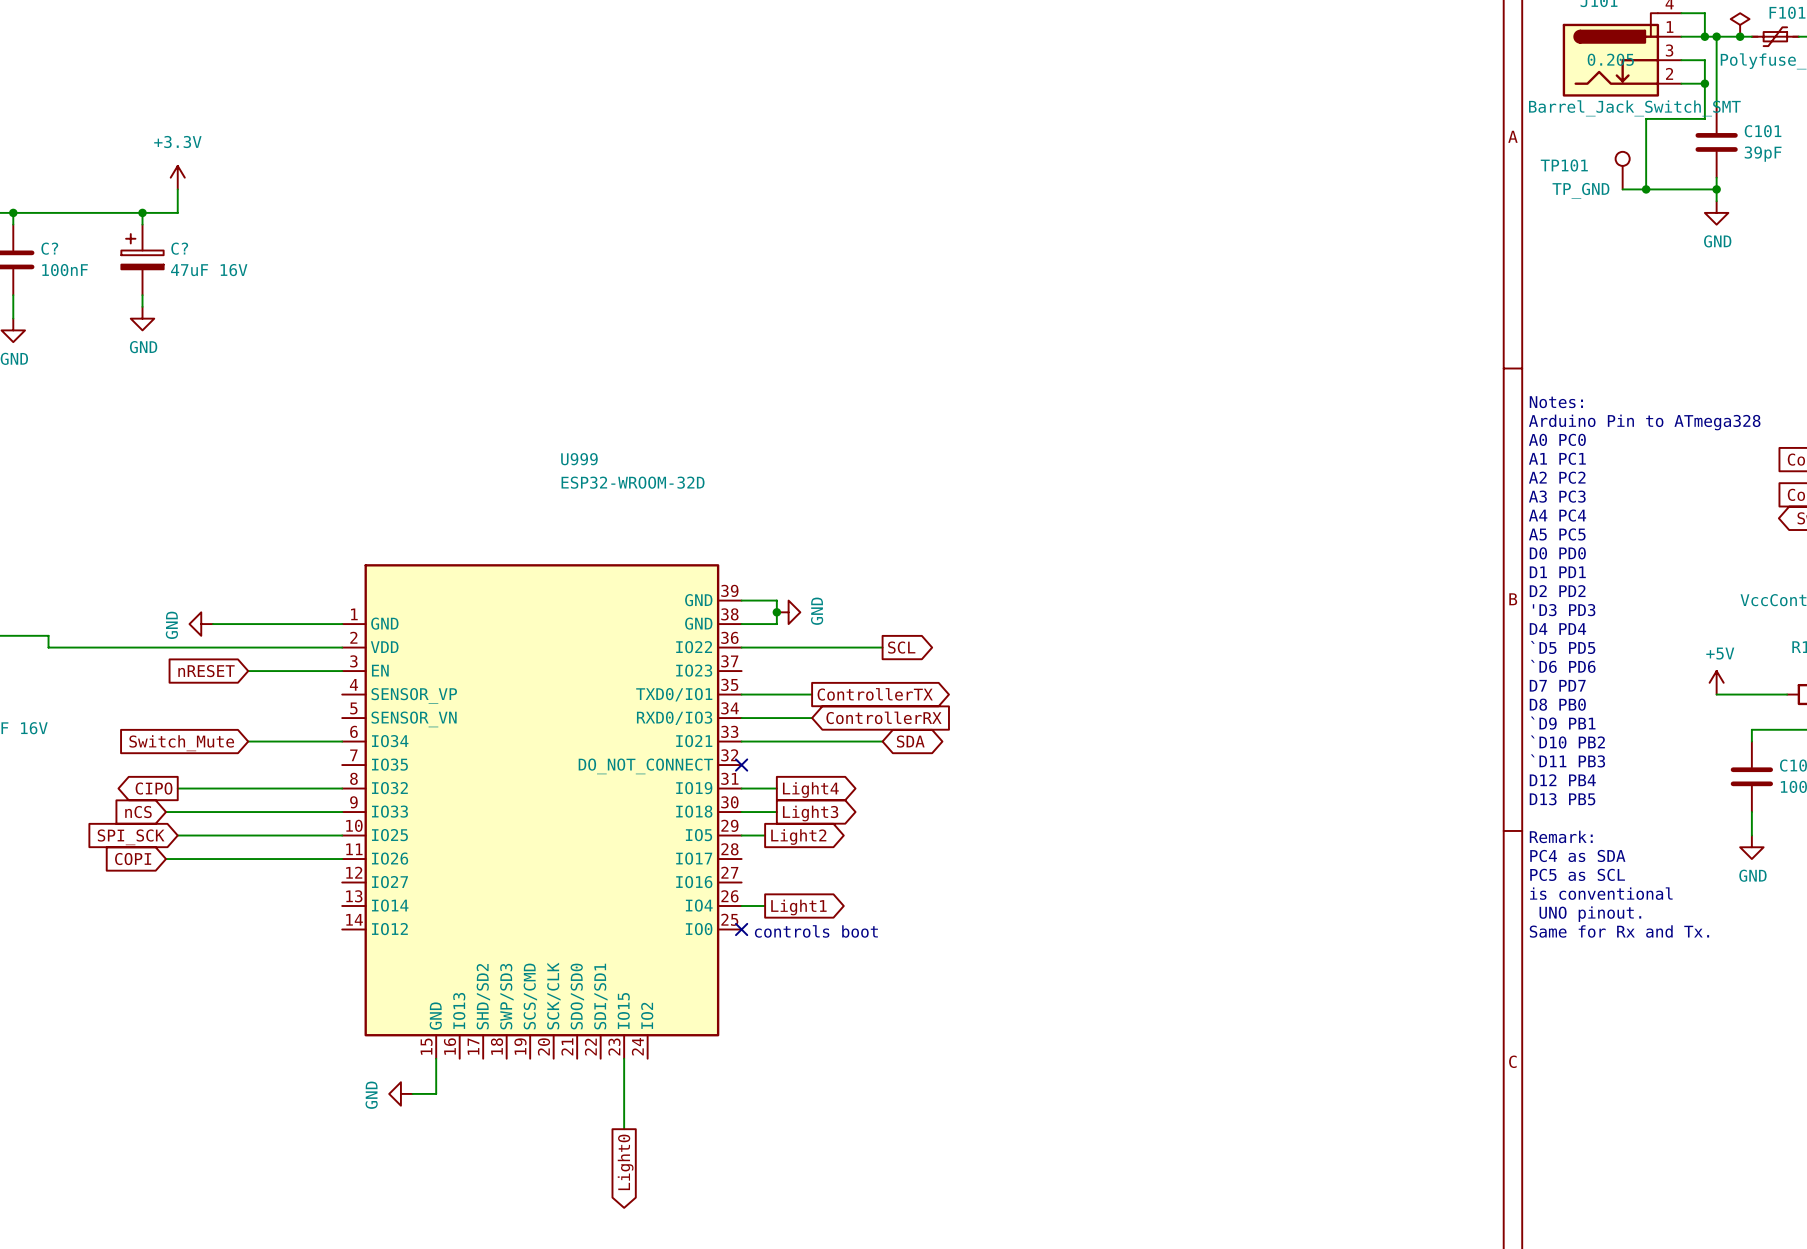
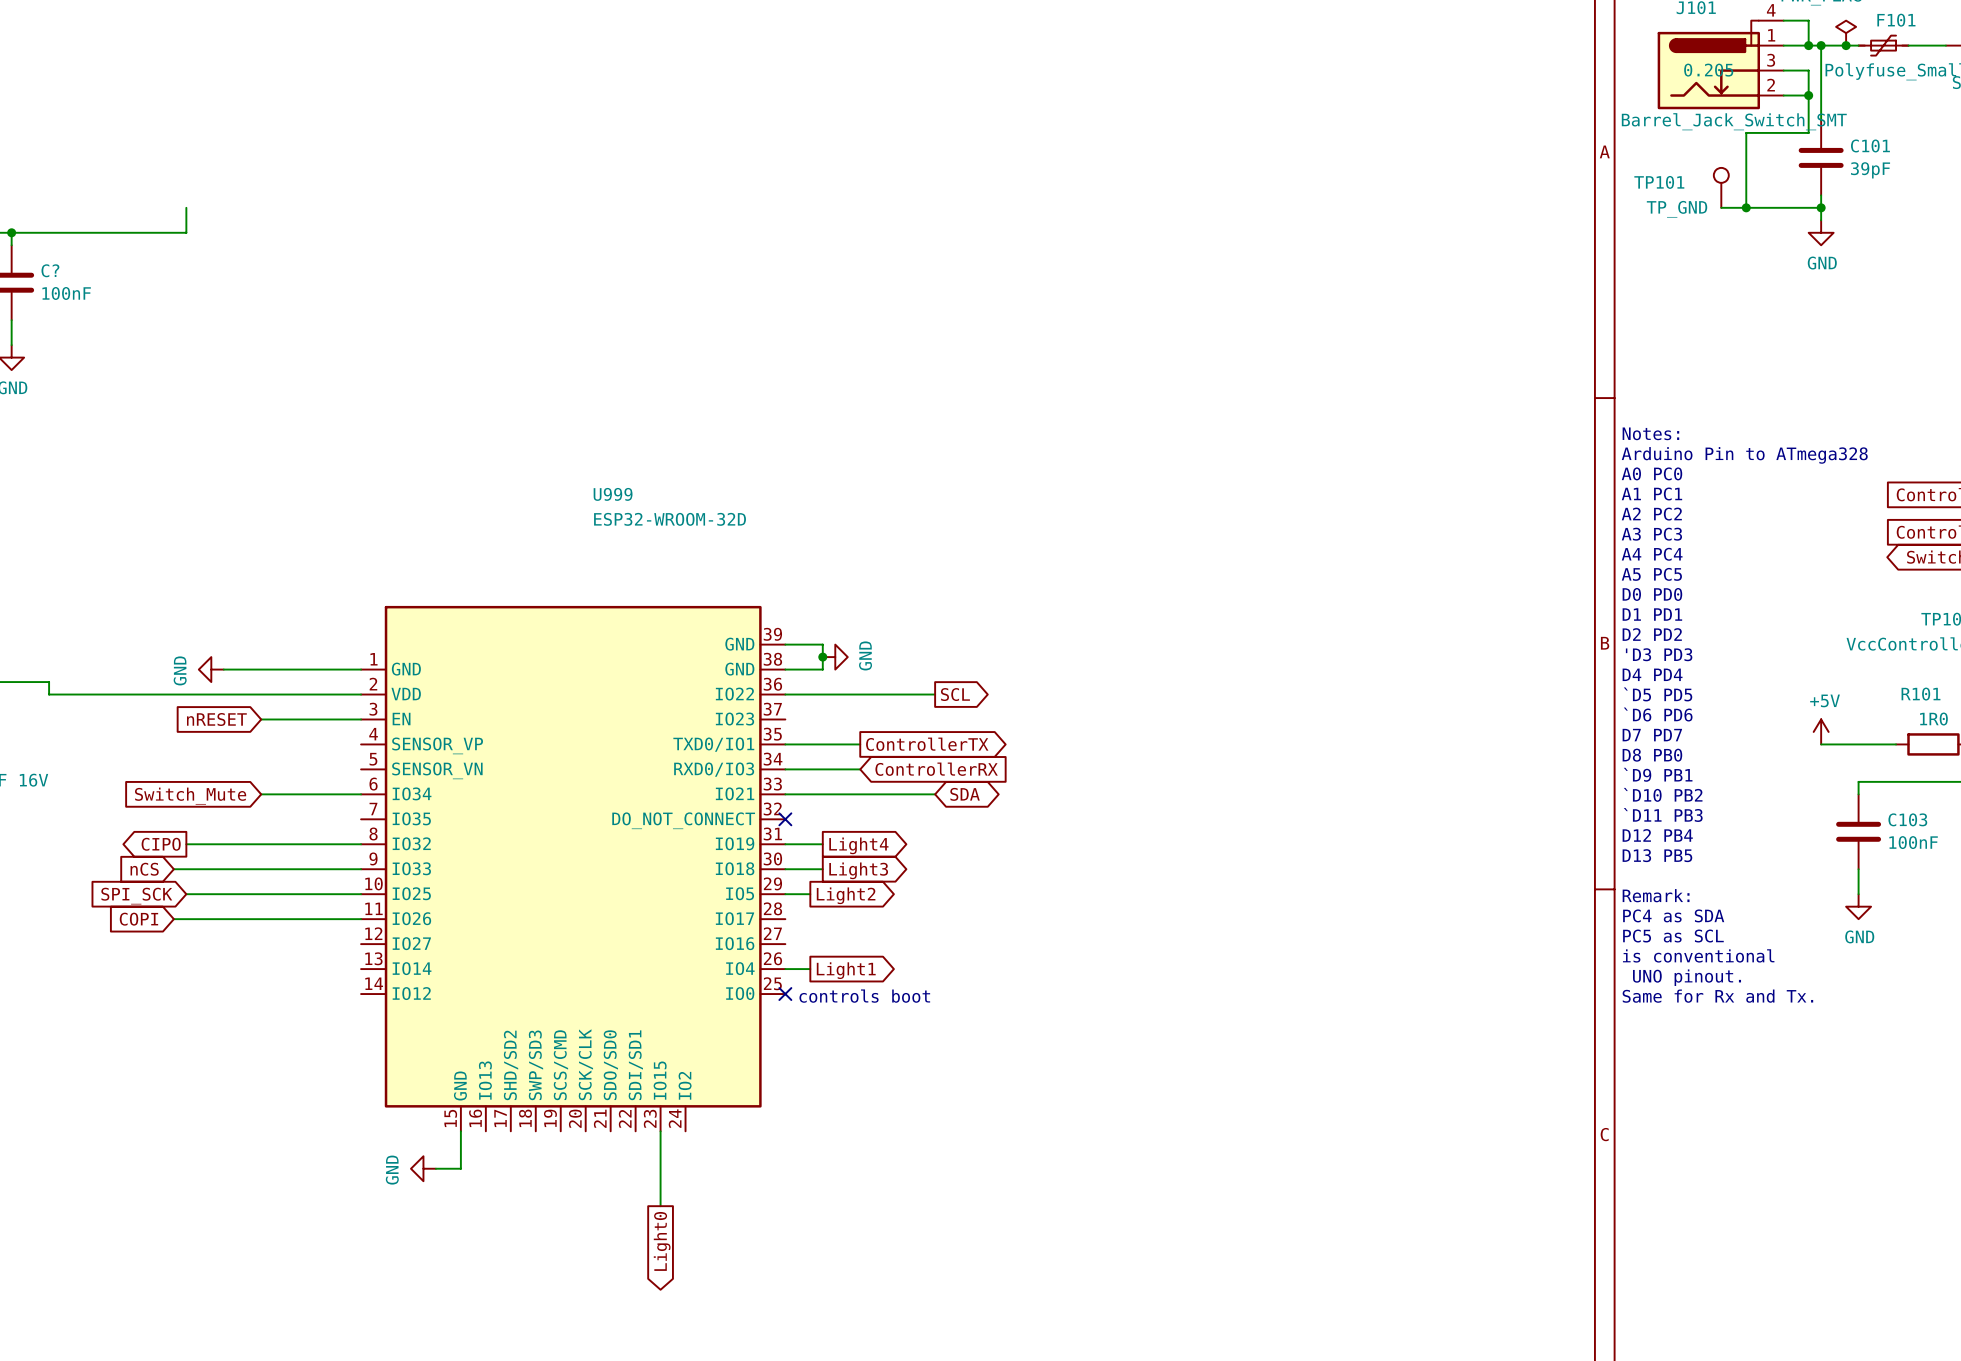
power symbol: +3.3V (177, 177) -> none
wire: (142, 212) (142, 224) -> none
junction: (142, 212) -> none
C?: 47uF 16V (142, 259) -> none
wire: (142, 295) (142, 306) -> none
power symbol: GND (142, 318) -> none

